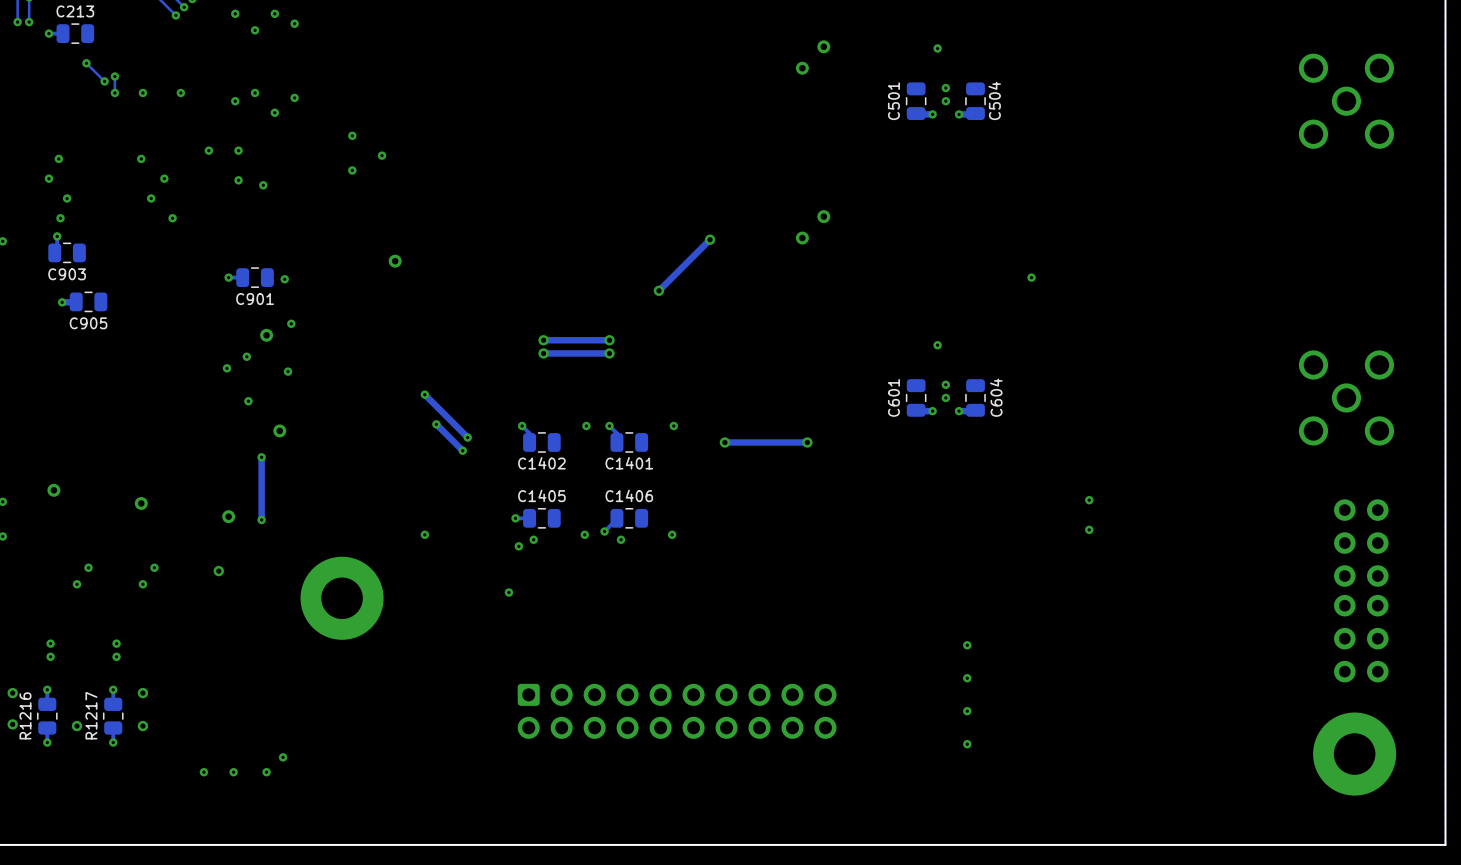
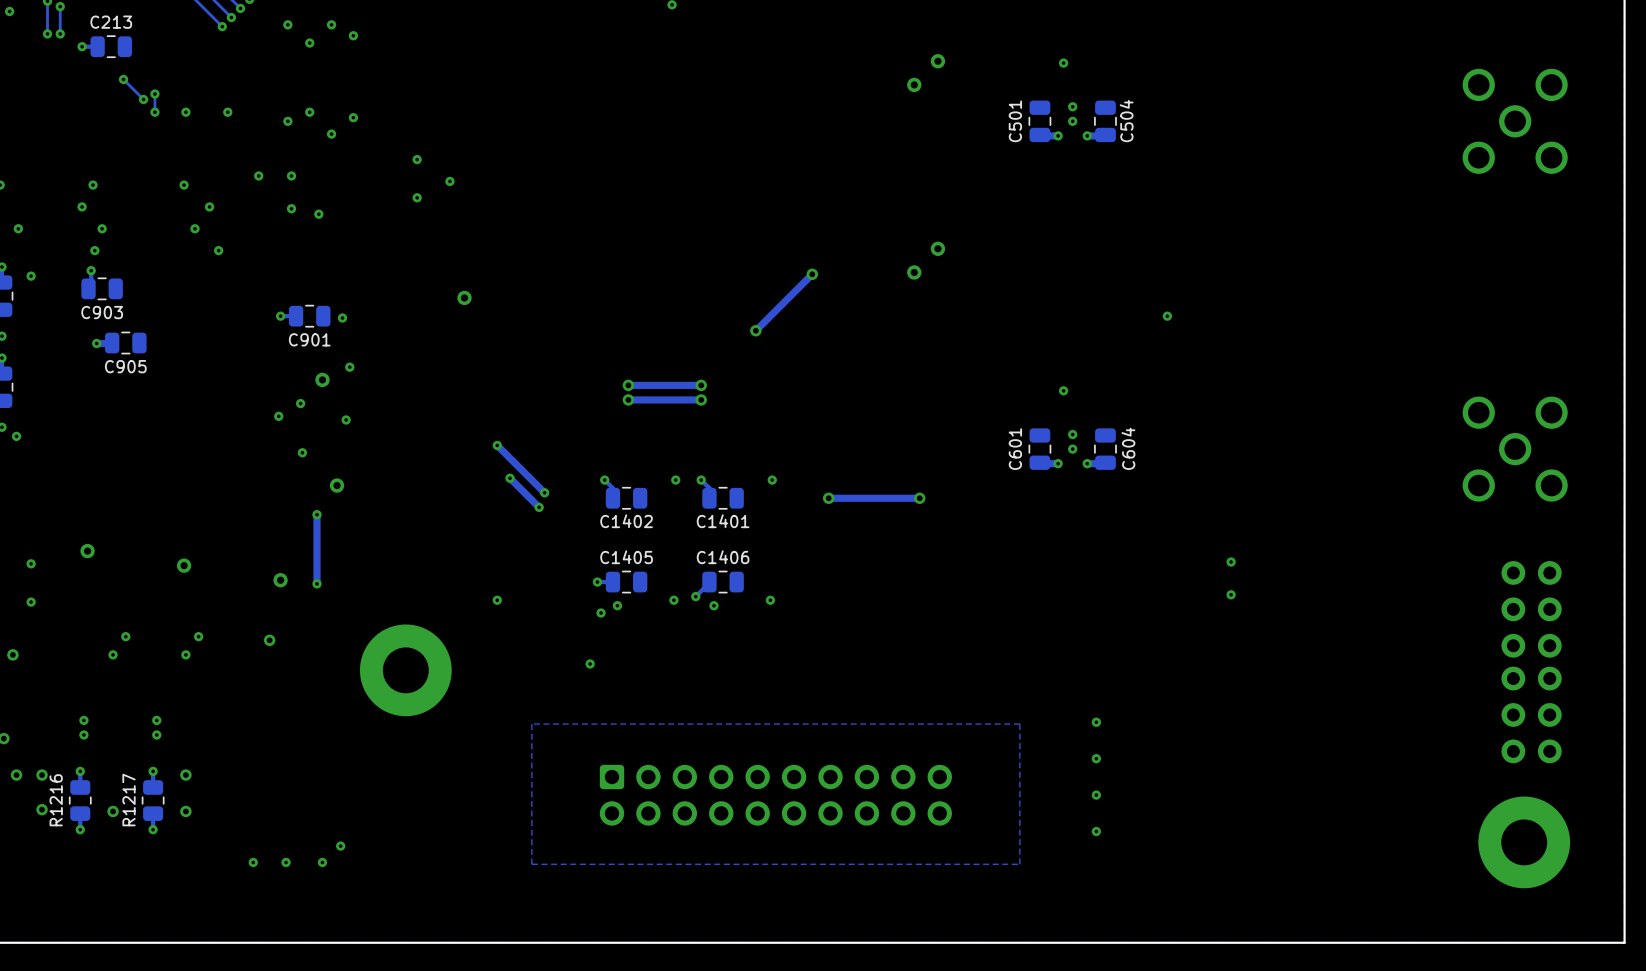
zone outline: none -> (1019, 724) (1019, 864) (531, 864) (531, 724) (1019, 724)

